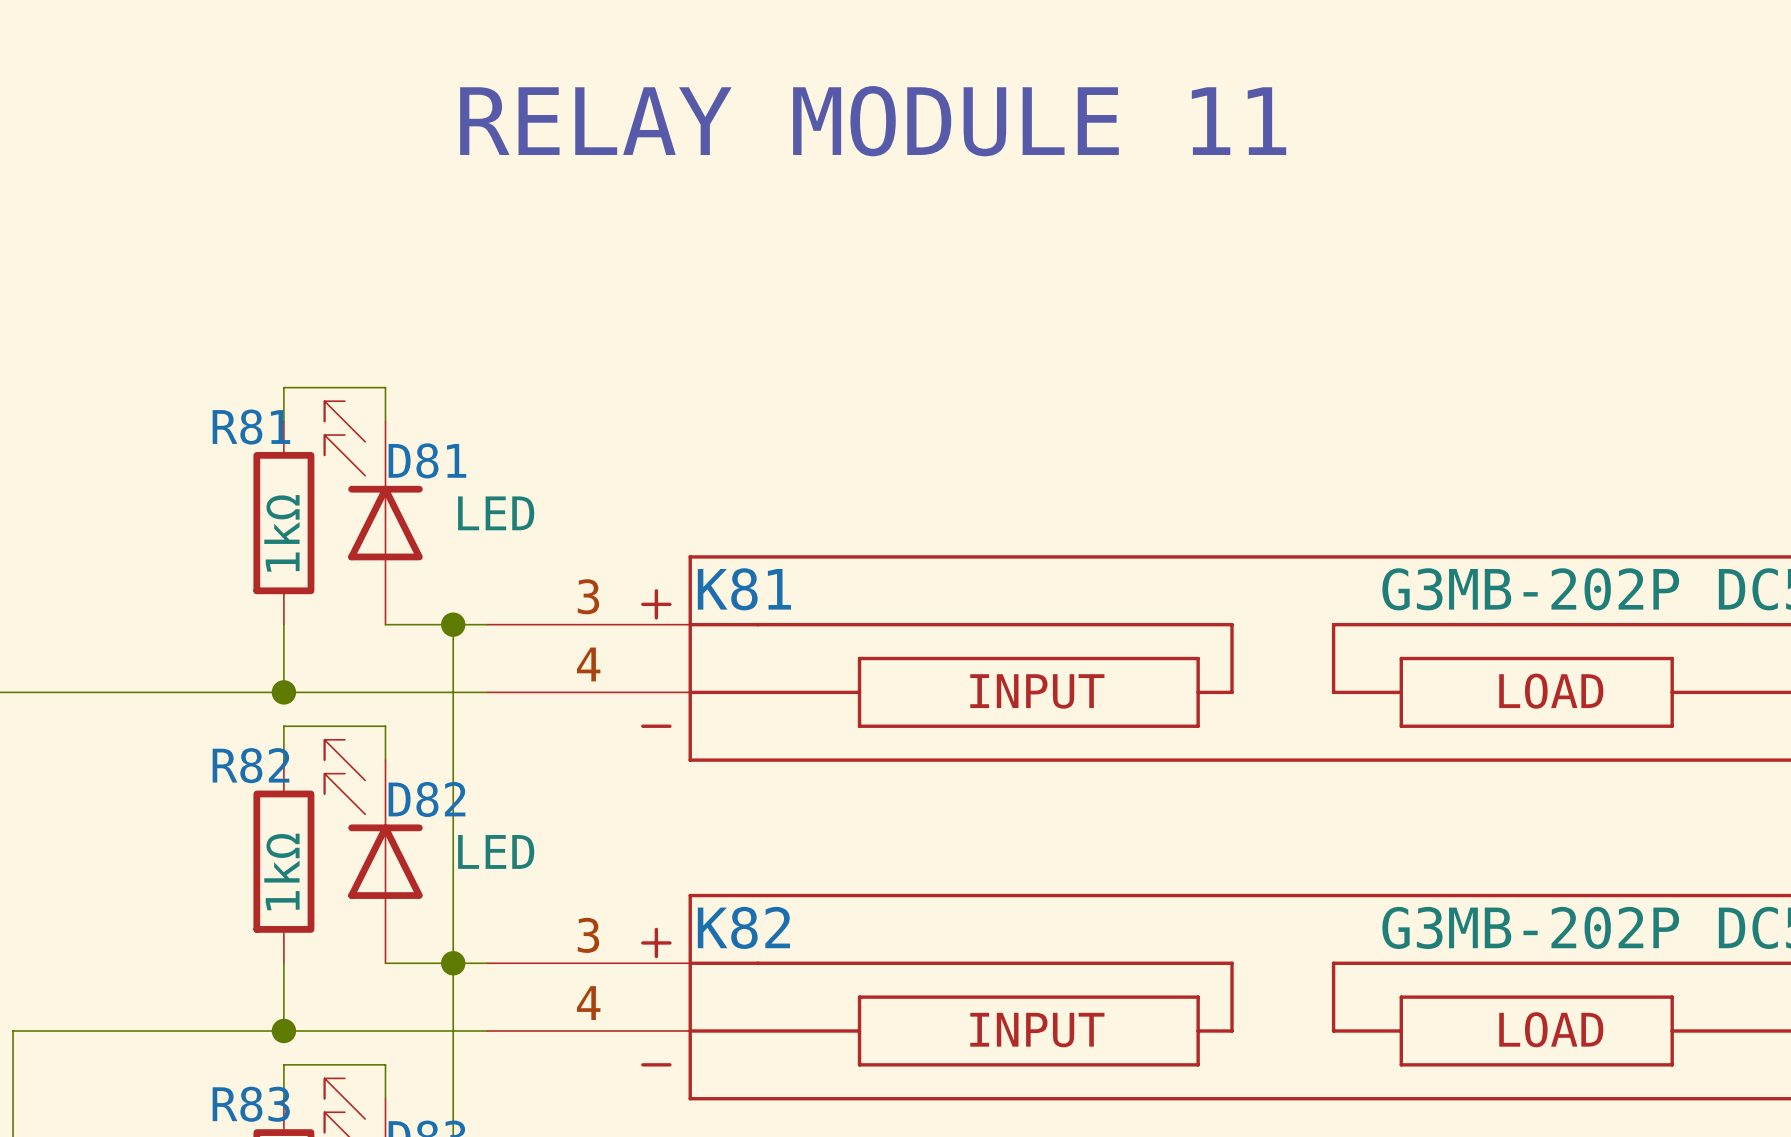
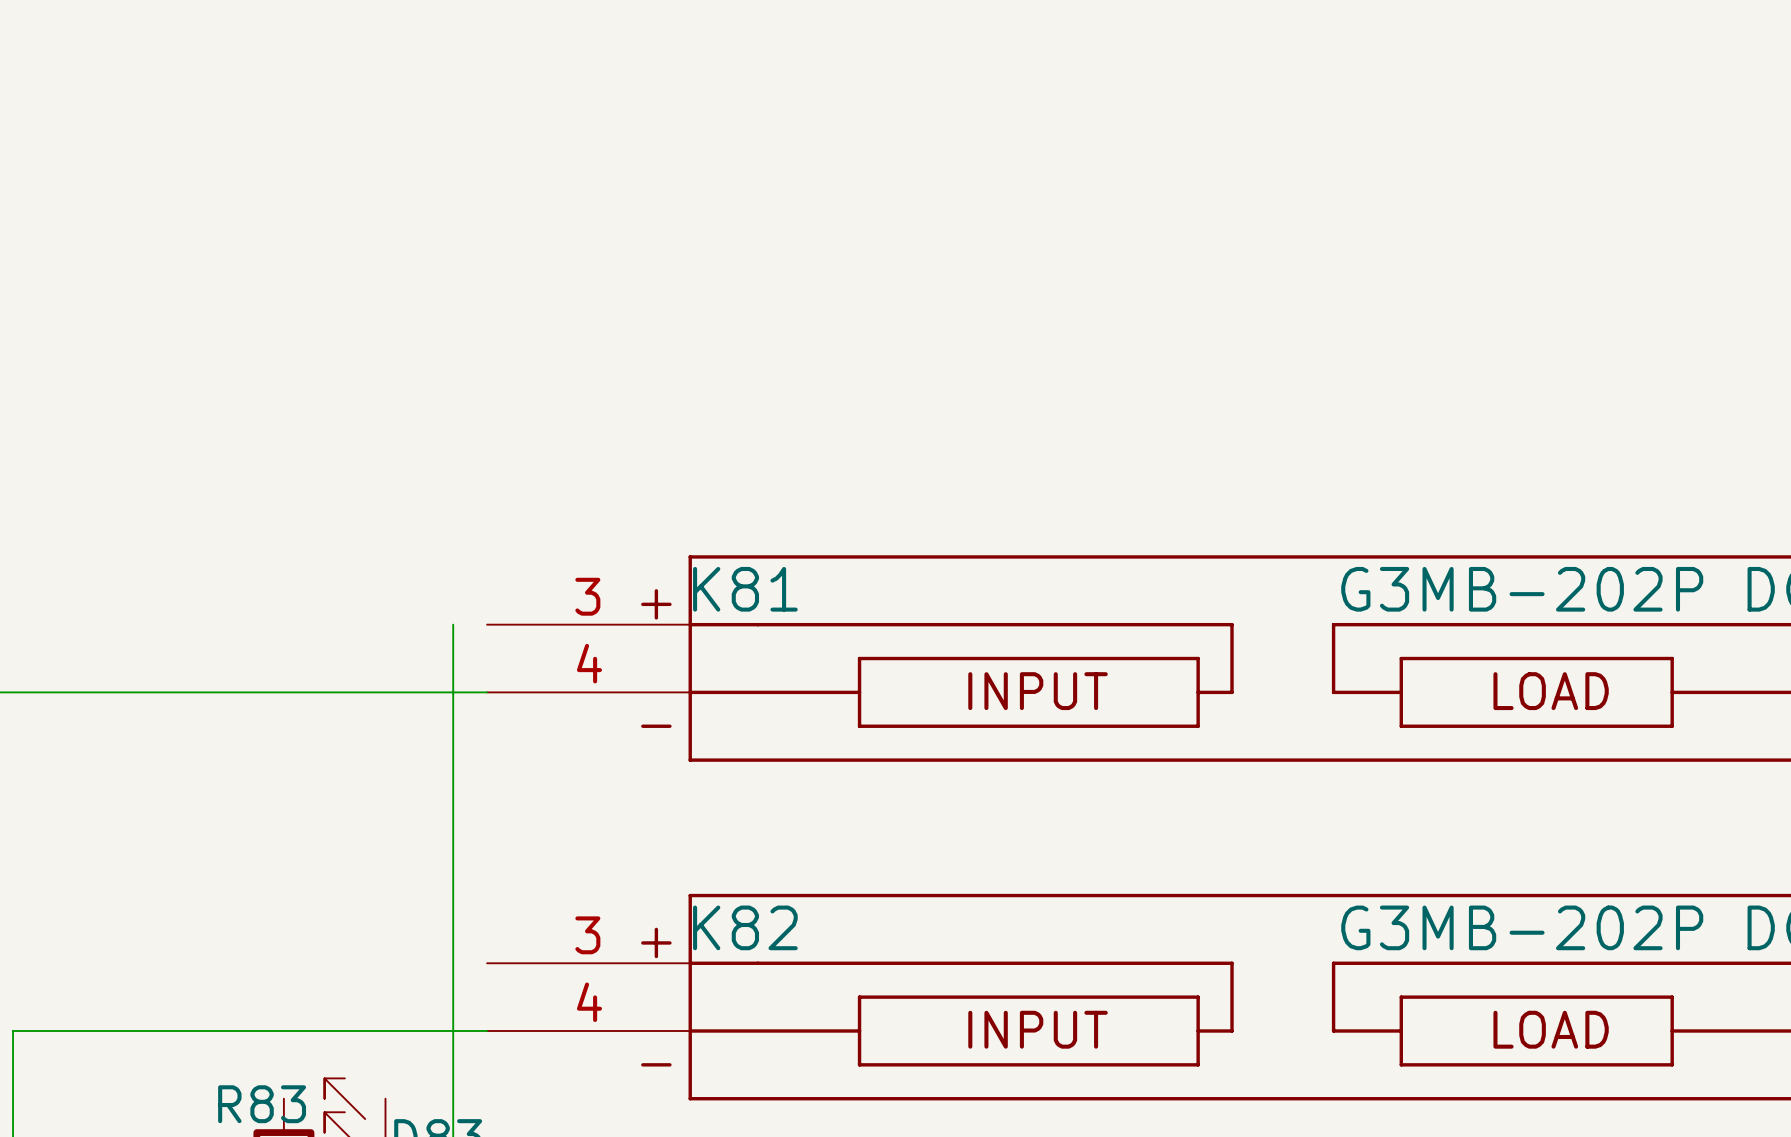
text: RELAY MODULE 11 (873, 121) -> none
wire: (283, 421) (283, 387) (385, 387) (385, 421) -> none
D81: LED (373, 512) -> none
R81: 1kΩ (283, 523) -> none
wire: (283, 624) (283, 692) -> none
wire: (385, 624) (487, 624) -> none
junction: (453, 624) -> none
junction: (283, 692) -> none
wire: (283, 760) (283, 726) (385, 726) (385, 760) -> none
D82: LED (373, 851) -> none
R82: 1kΩ (283, 861) -> none
wire: (283, 963) (283, 1030) -> none
wire: (385, 963) (487, 963) -> none
junction: (453, 963) -> none
junction: (283, 1030) -> none
wire: (283, 1098) (283, 1064) (385, 1064) (385, 1098) -> none

